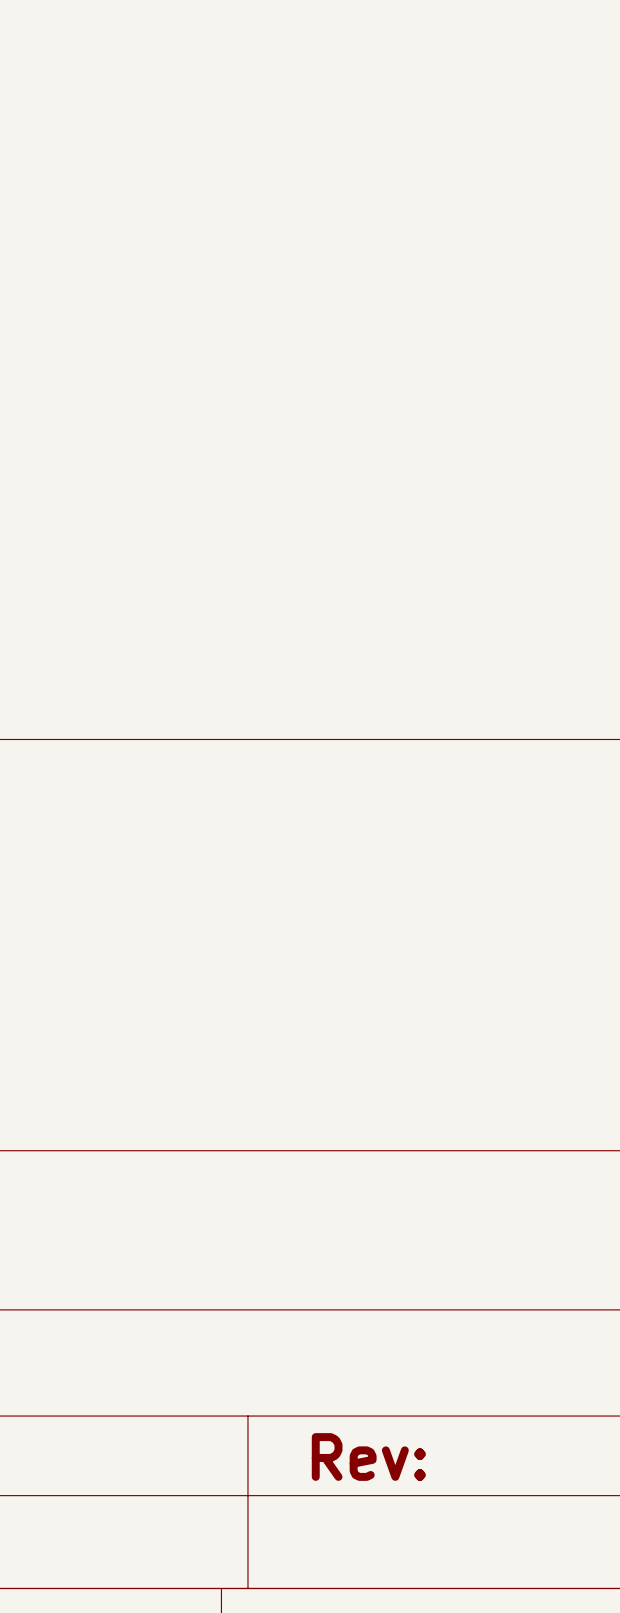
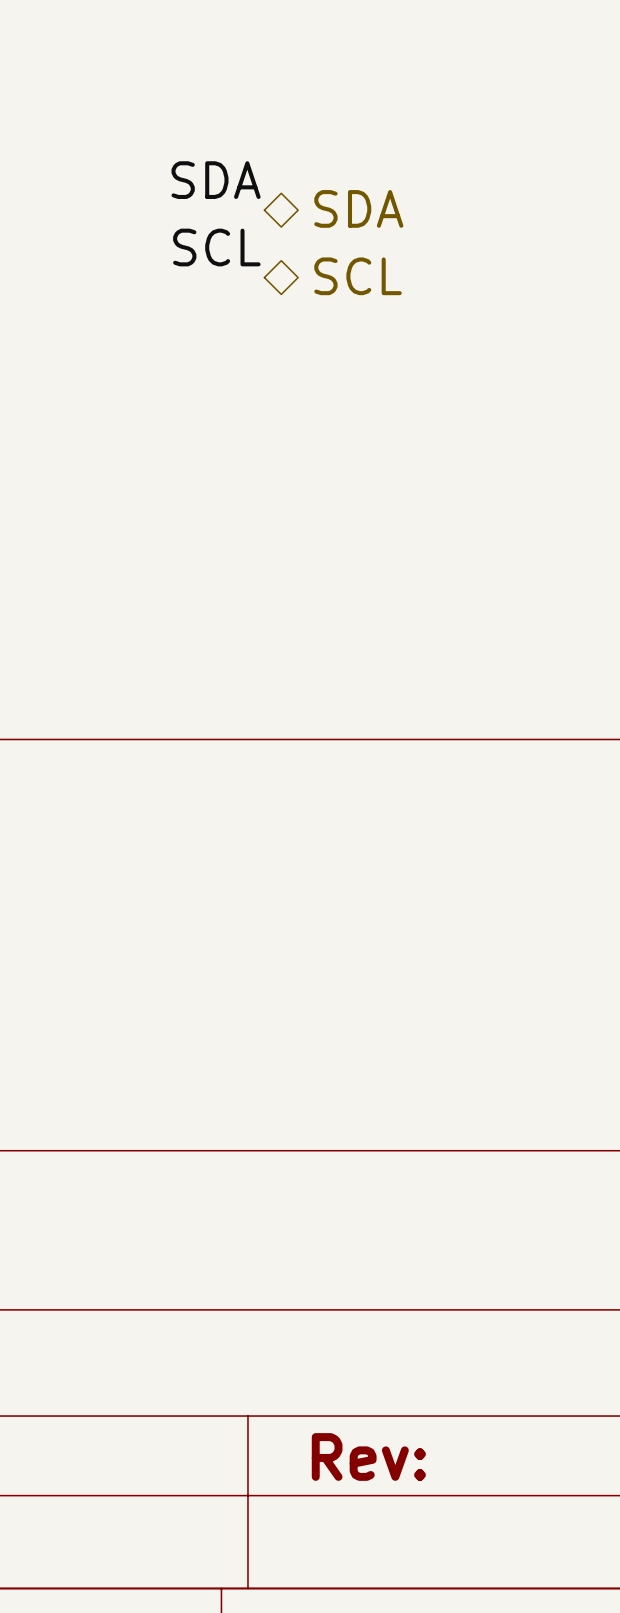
label: none -> SDA (216, 180)
hierarchical label: none -> SDA (358, 208)
label: none -> SCL (216, 247)
hierarchical label: none -> SCL (358, 276)

